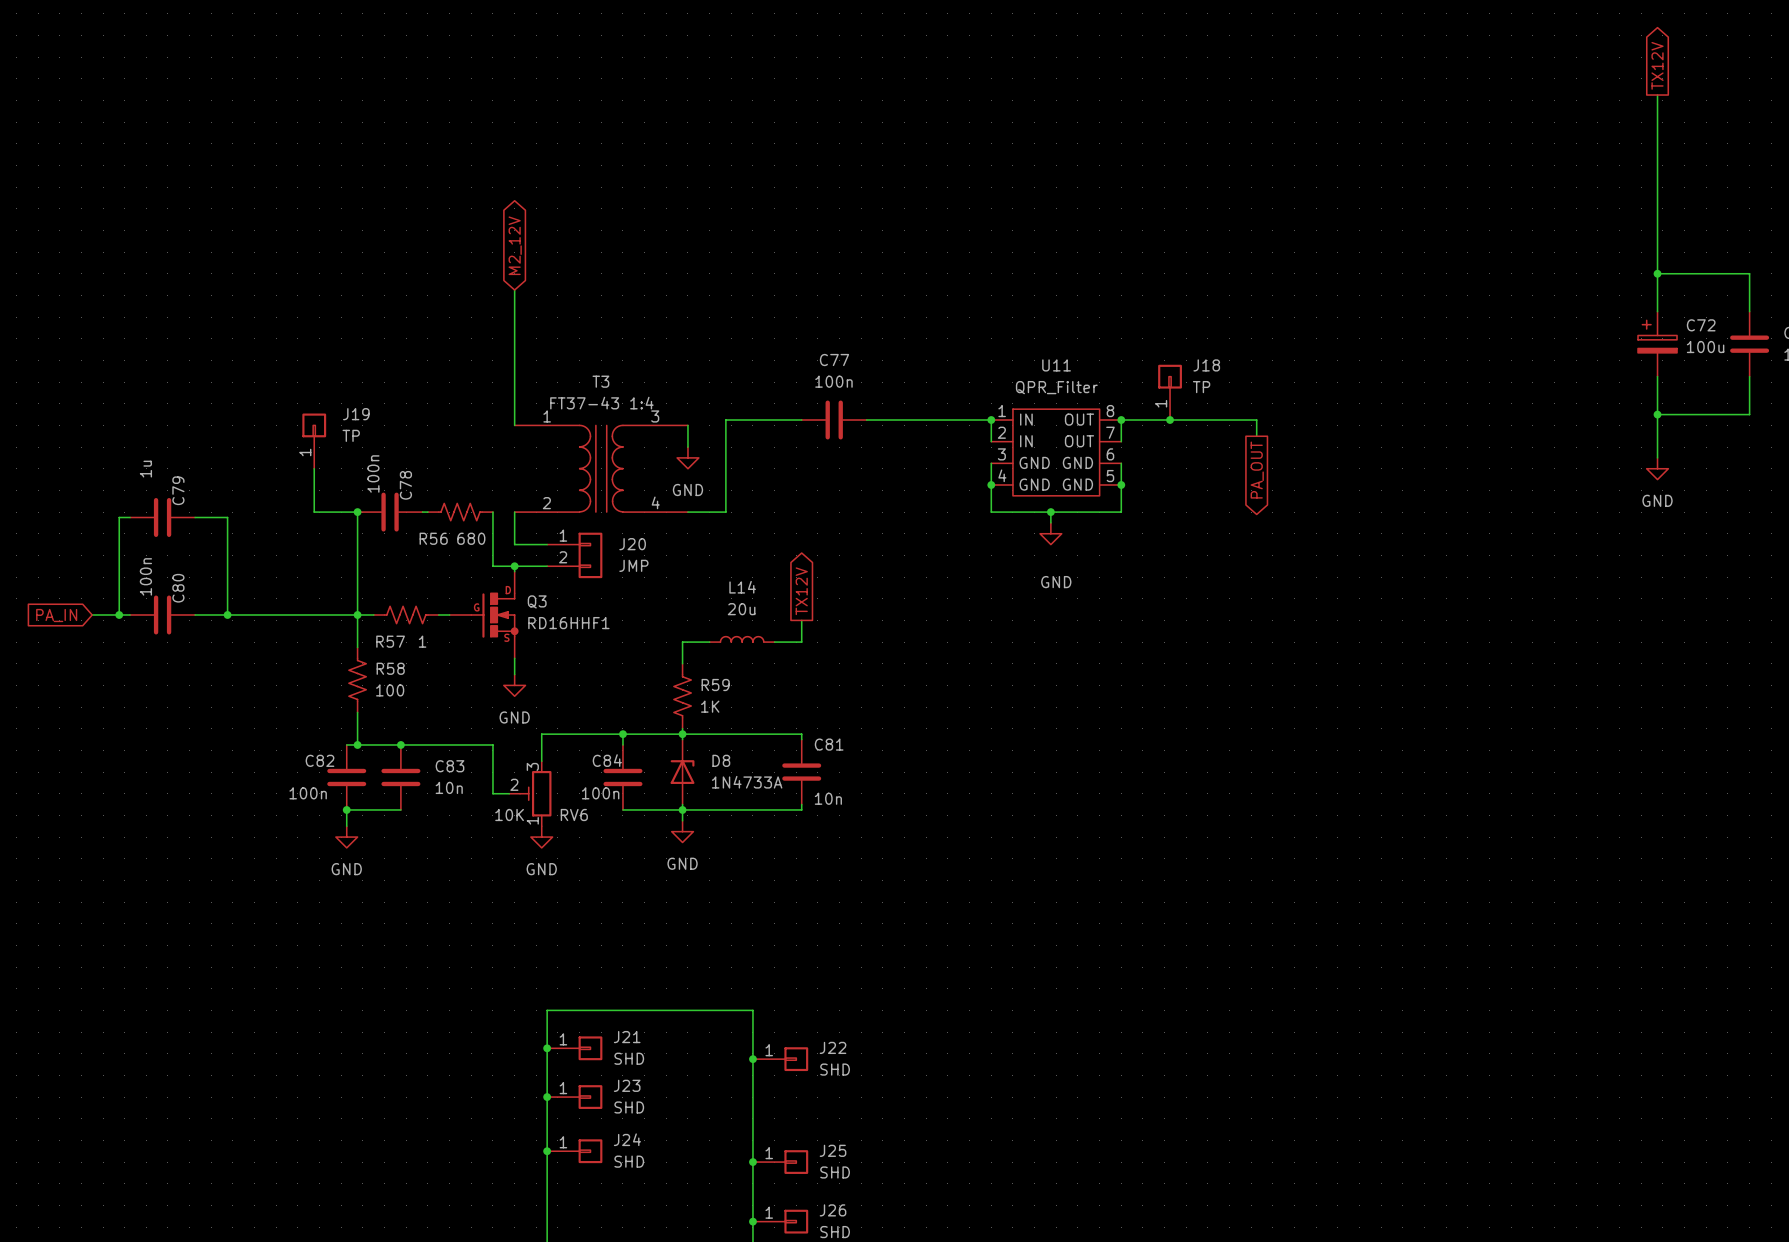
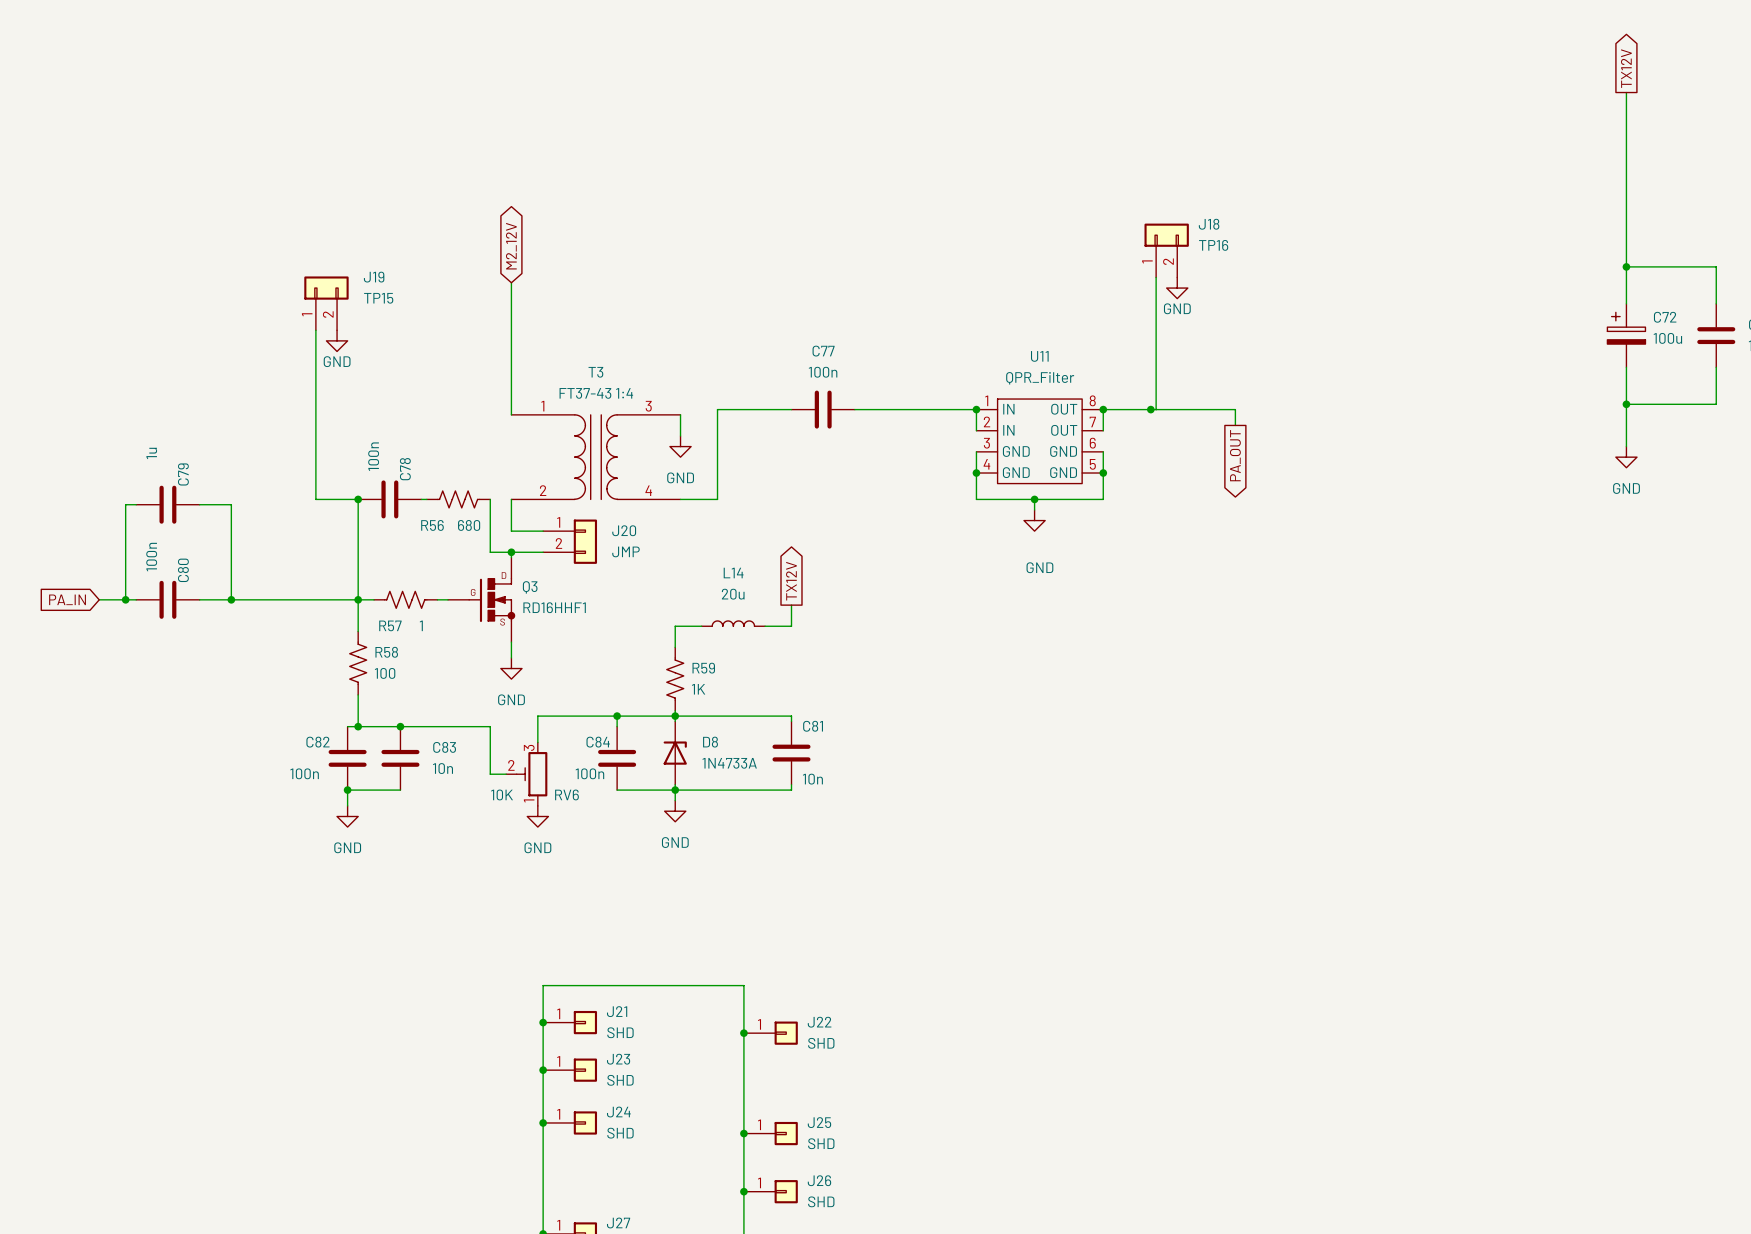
wire: none -> (1156, 277) (1156, 409)
power symbol: none -> GND (1177, 288)
wire: none -> (315, 330) (315, 457)
power symbol: none -> GND (337, 340)
J18 symbol: [1158, 364, 1182, 421] -> [1144, 223, 1189, 278]
J18 value: TP (1201, 387) -> TP16 (1213, 245)
J19 symbol: [302, 413, 327, 469] -> [304, 276, 349, 331]
J19 value: TP (351, 435) -> TP15 (378, 298)

